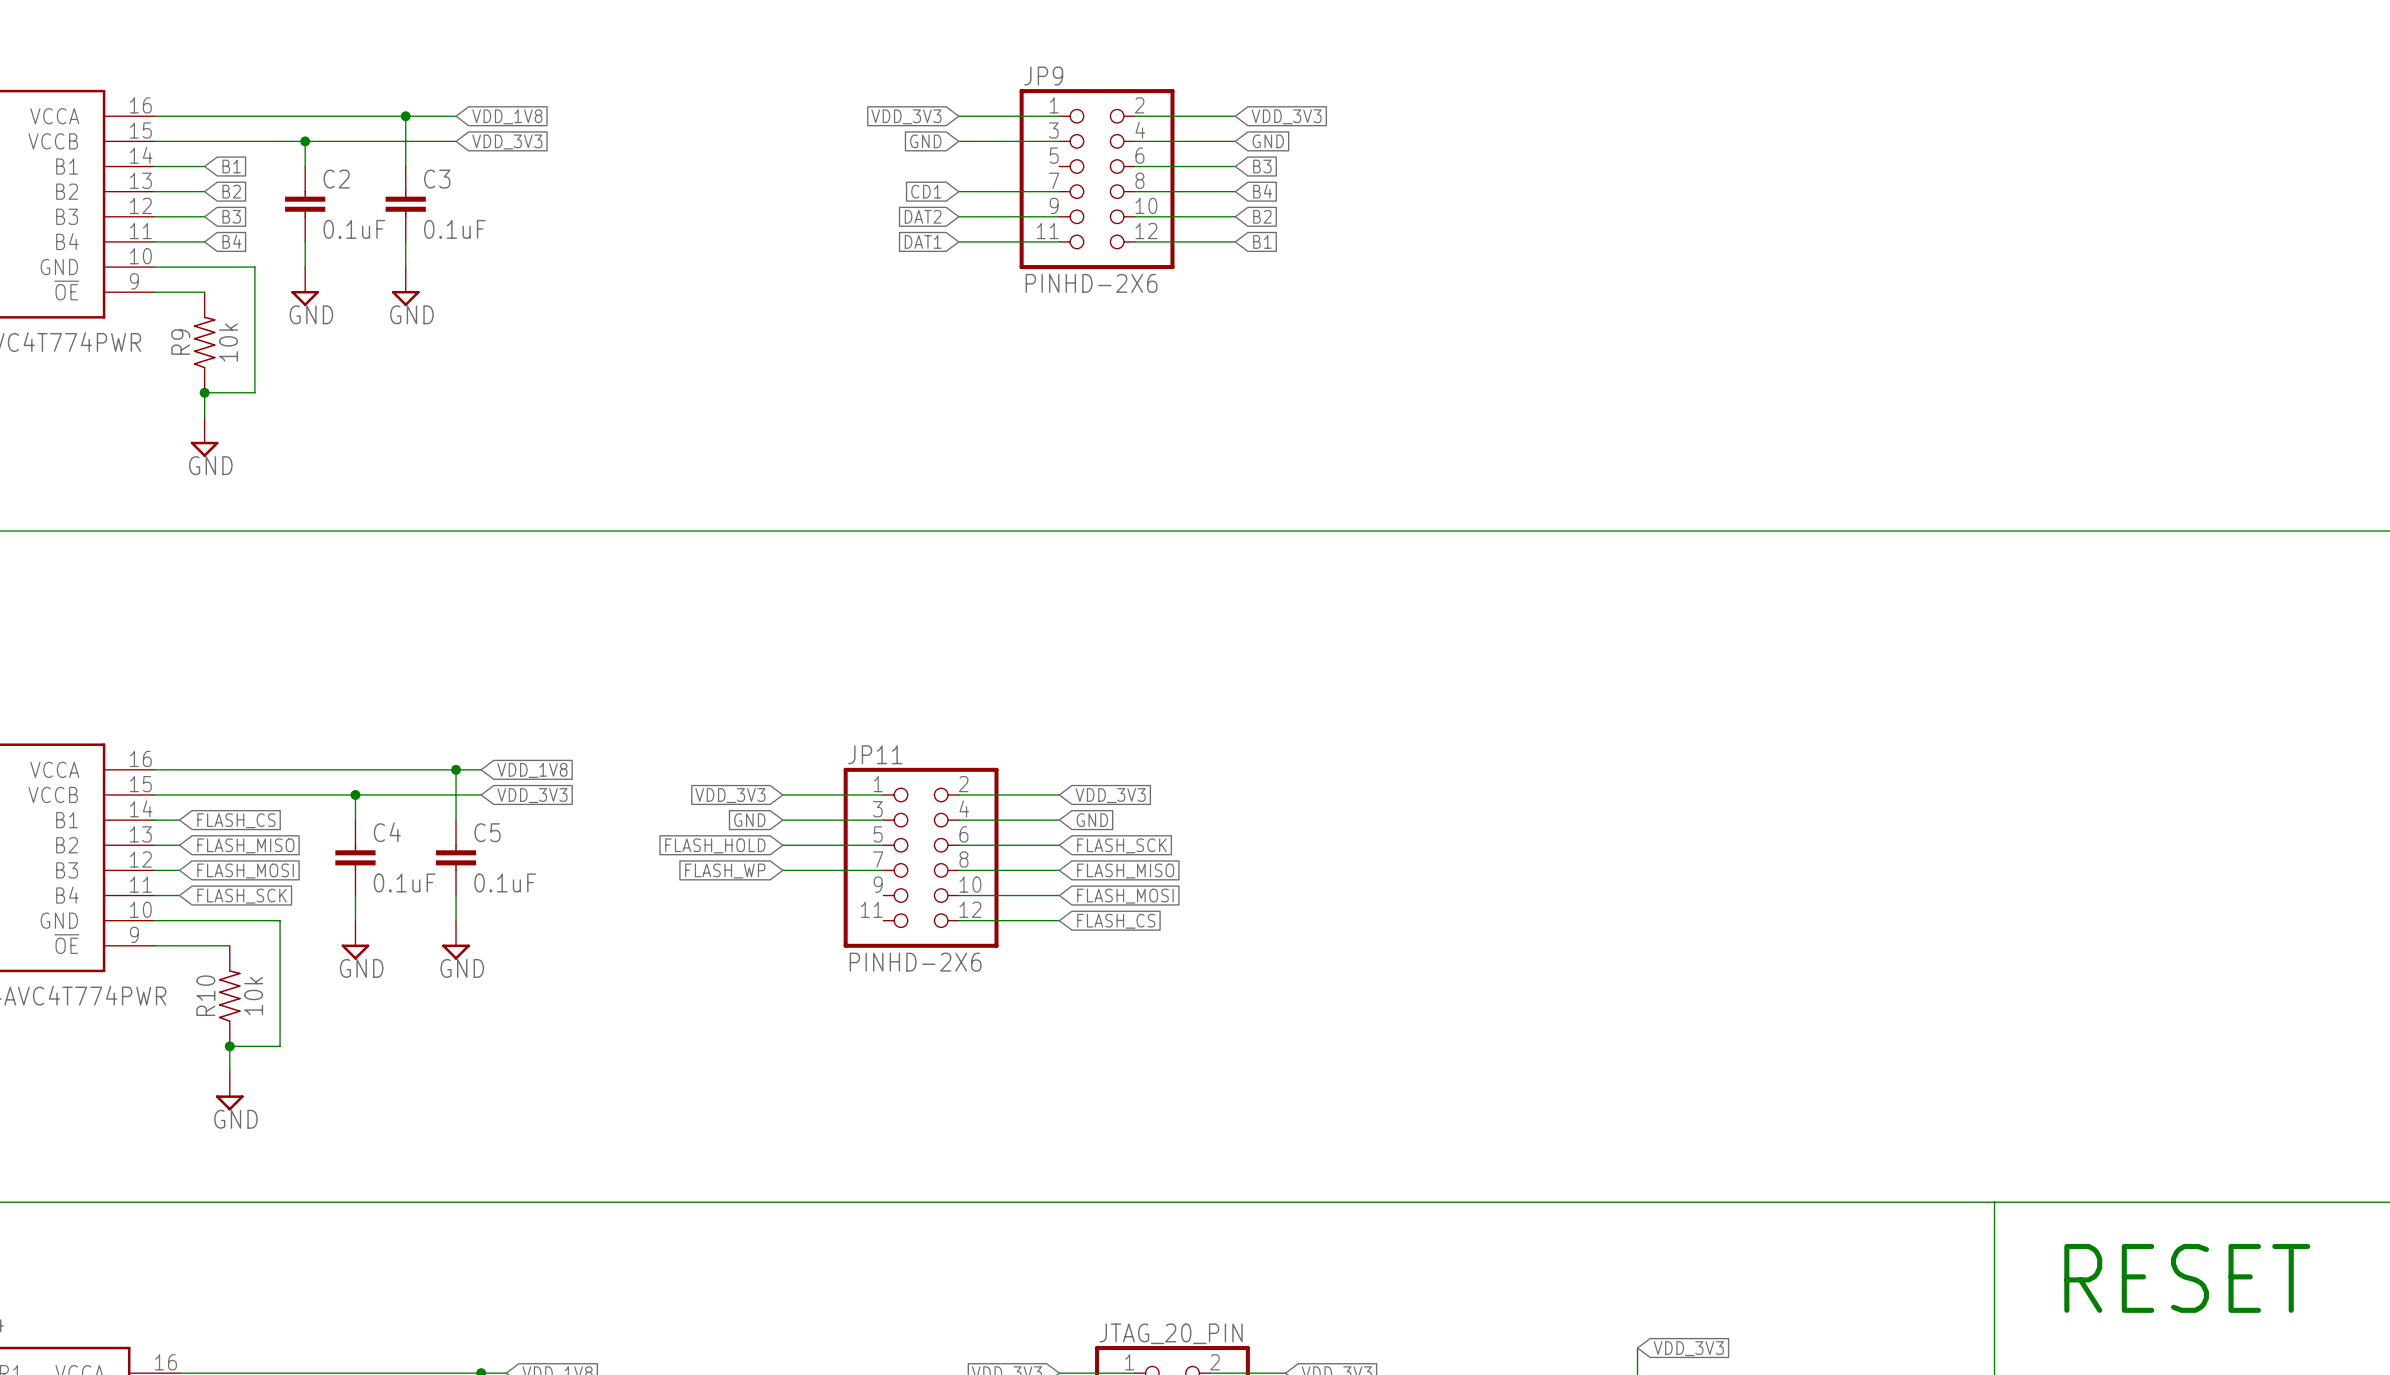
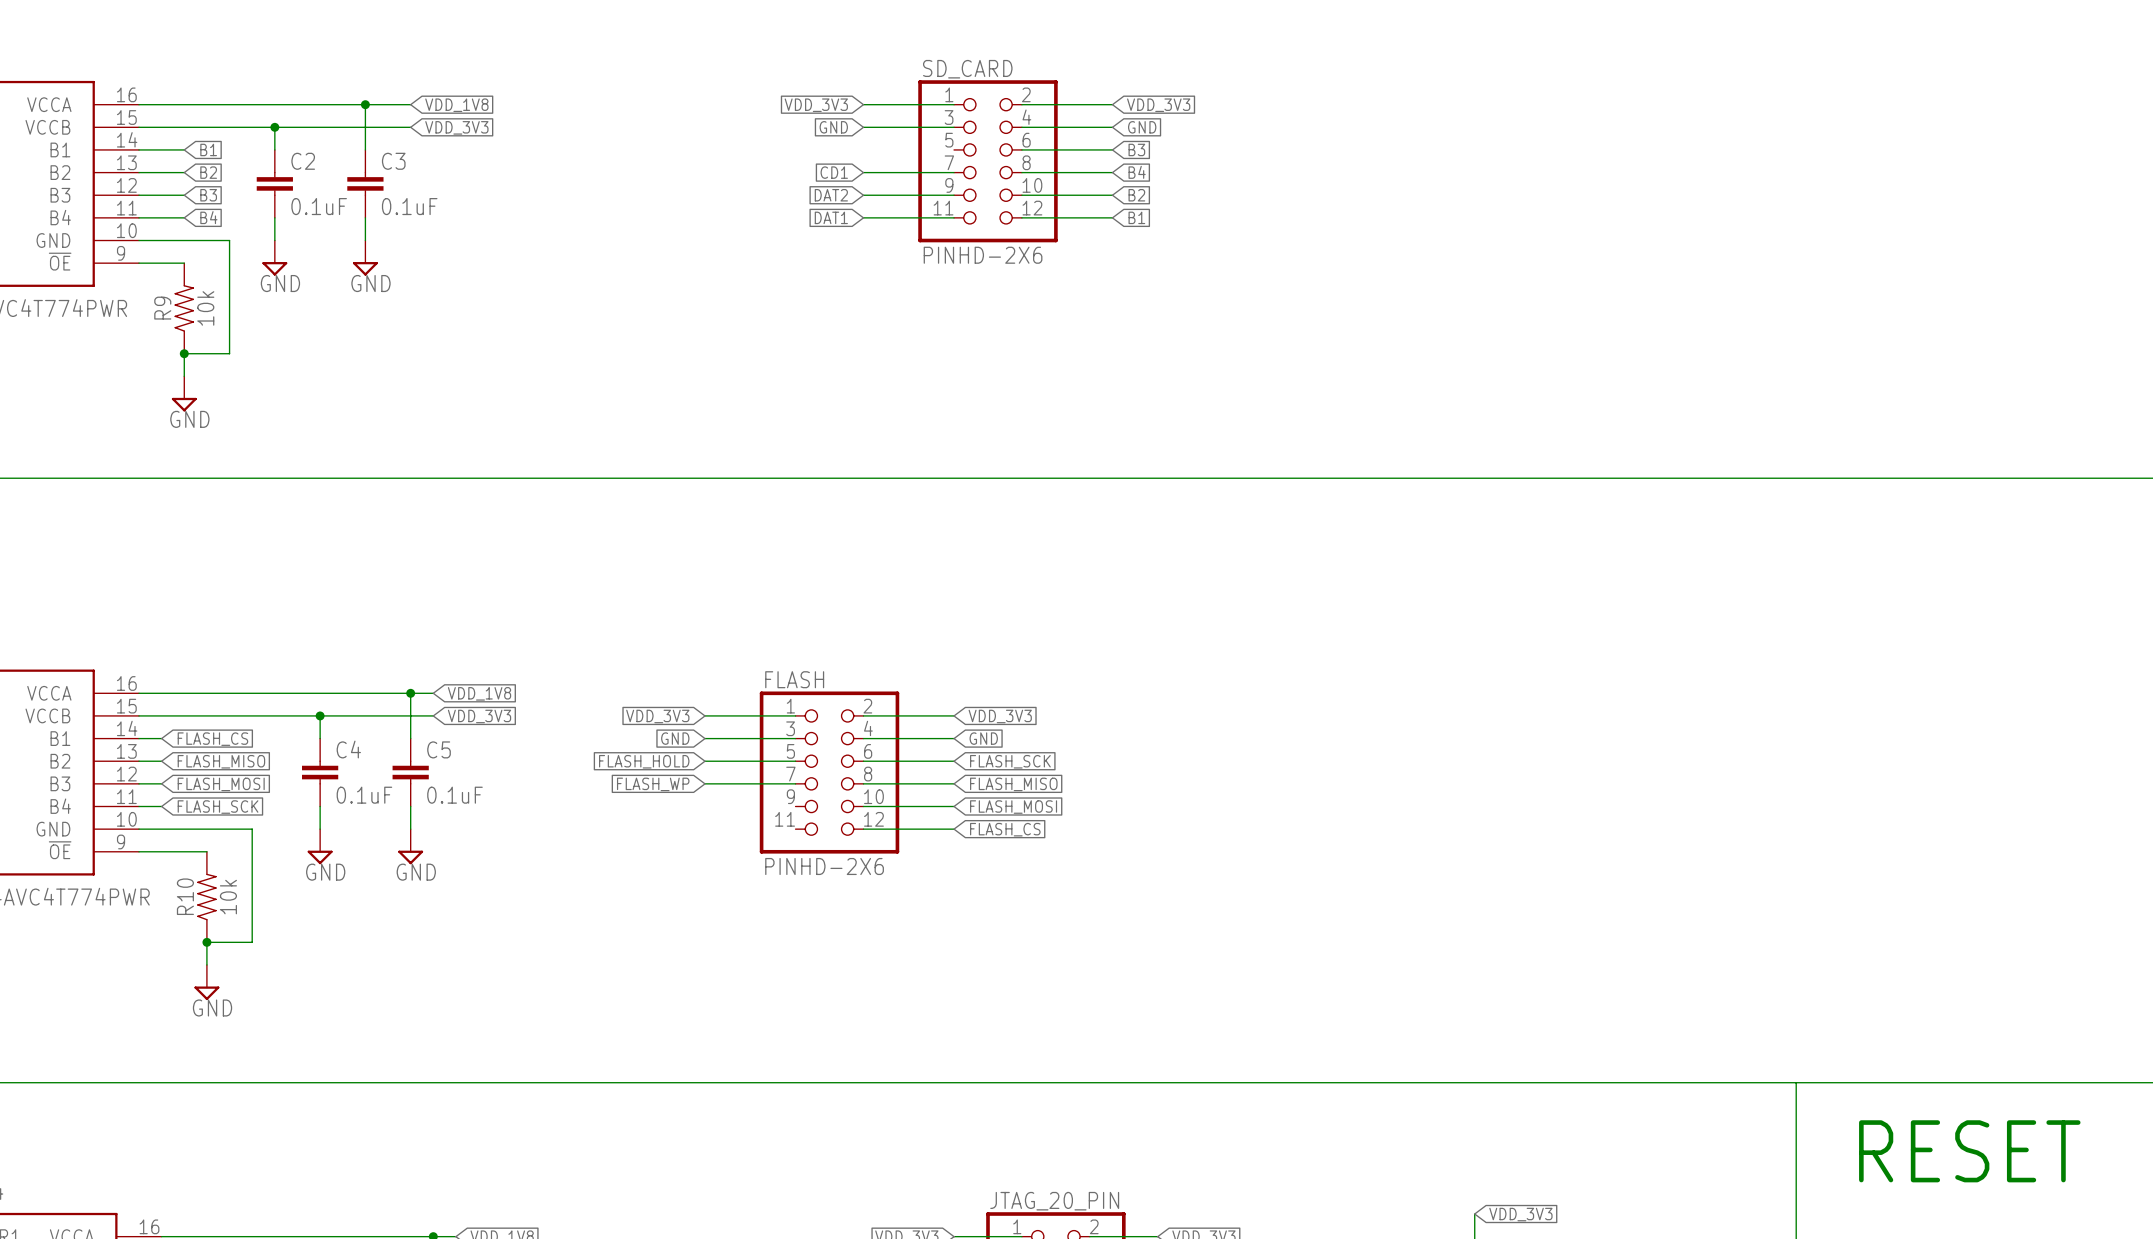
JP9 name: JP9 (1043, 76) -> SD_CARD (967, 69)
JP11 name: JP11 (875, 754) -> FLASH (794, 679)

